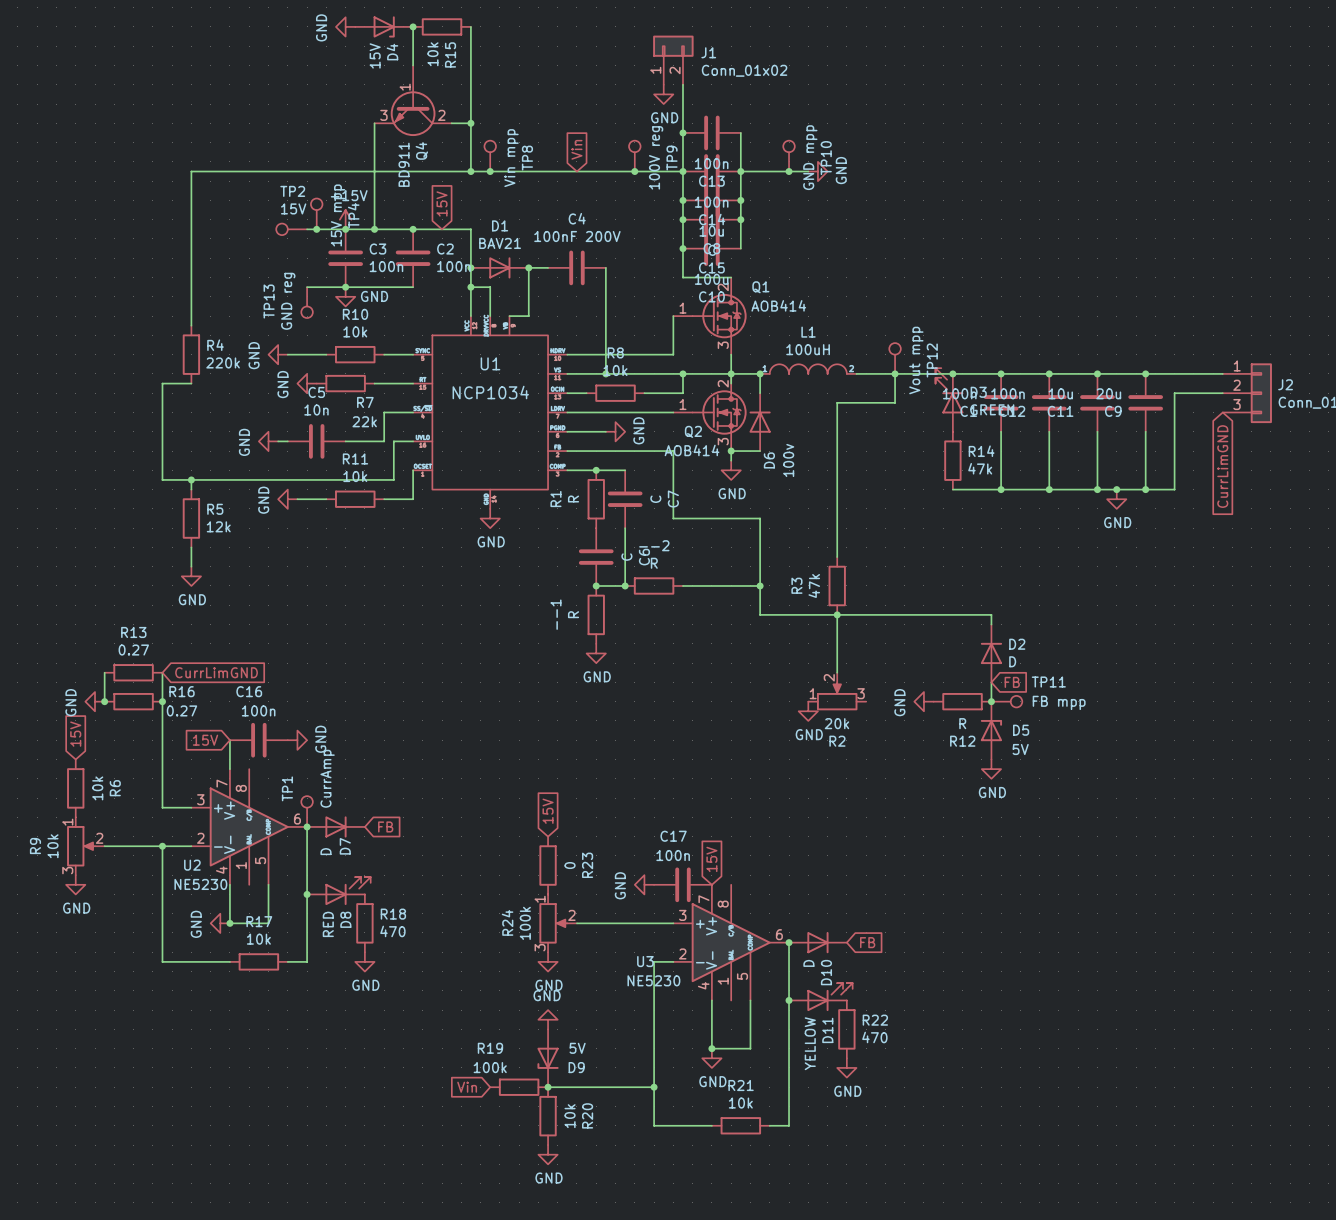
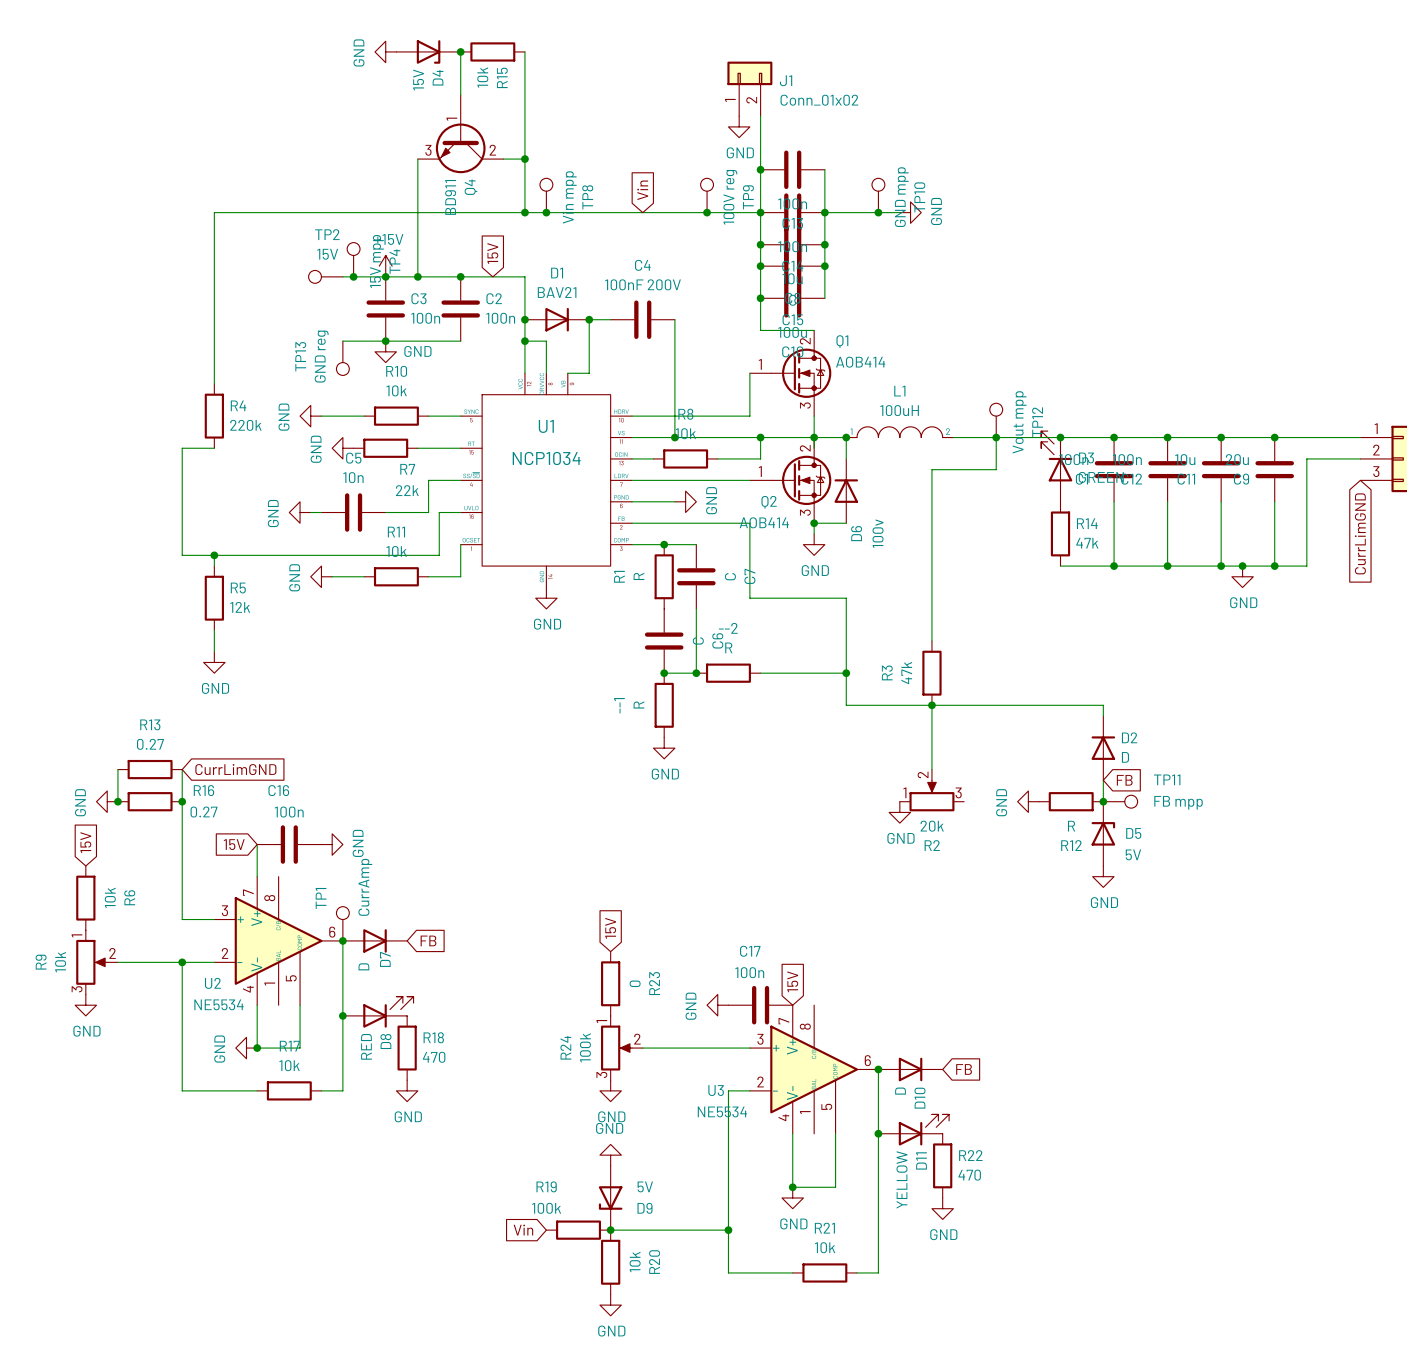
U2 value: NE5230 (200, 884) -> NE5534 (219, 1004)
U3 value: NE5230 (653, 980) -> NE5534 (722, 1111)

